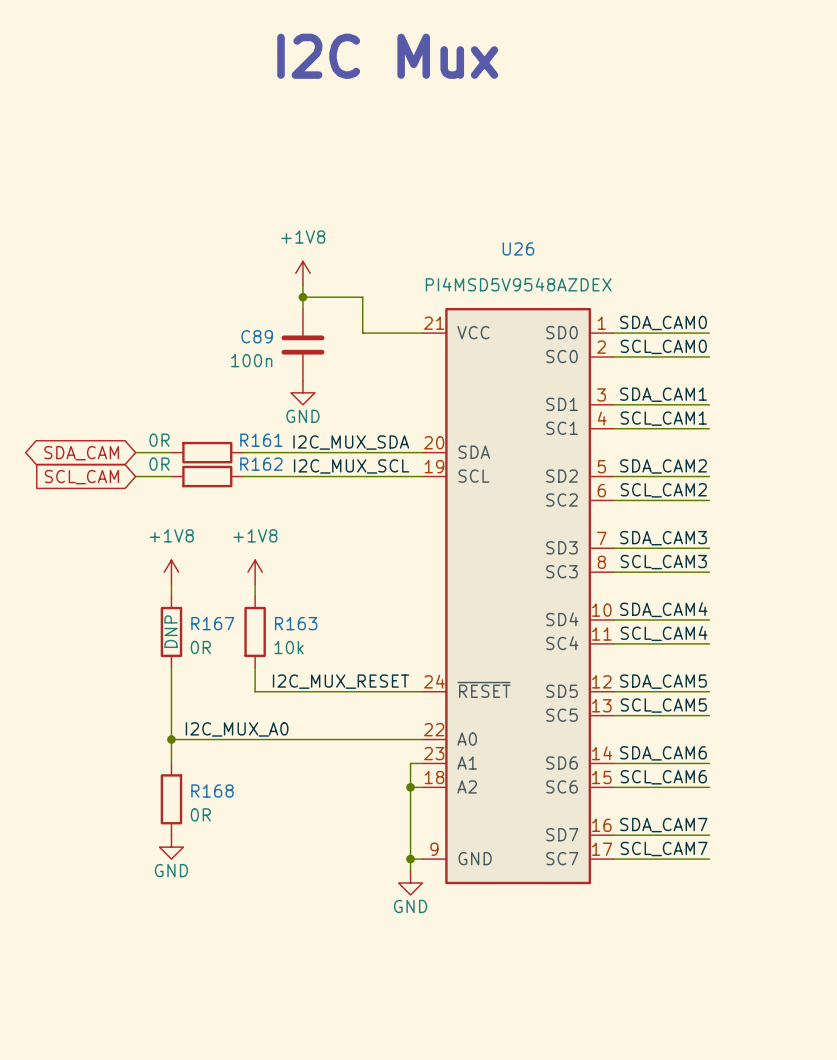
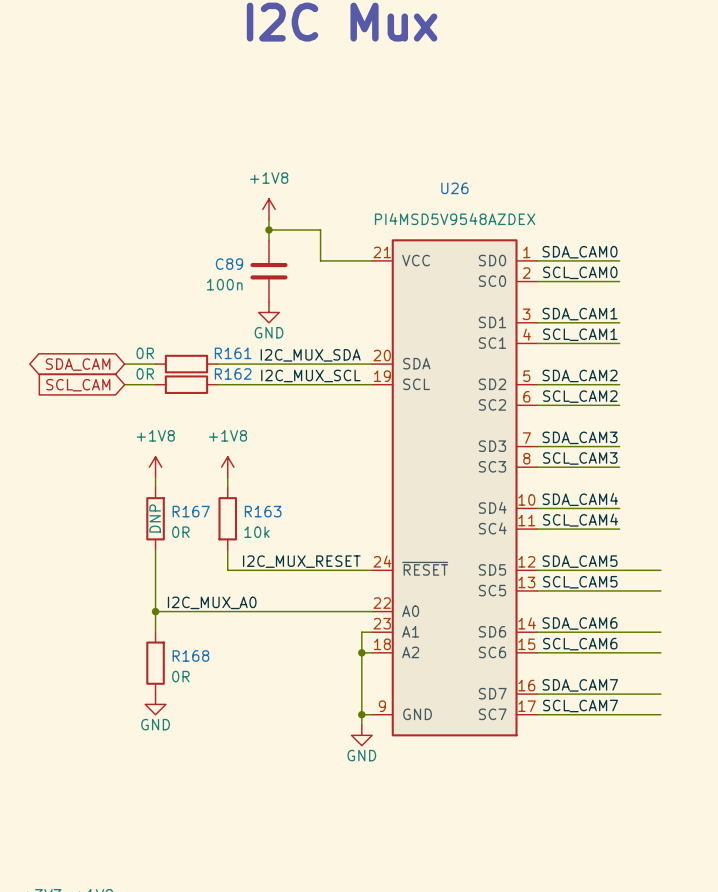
wire: none -> (619, 570) (660, 570)
wire: none -> (619, 590) (660, 590)
wire: none -> (619, 632) (660, 632)
wire: none -> (619, 652) (660, 652)
wire: none -> (619, 694) (660, 694)
wire: none -> (619, 714) (660, 714)

